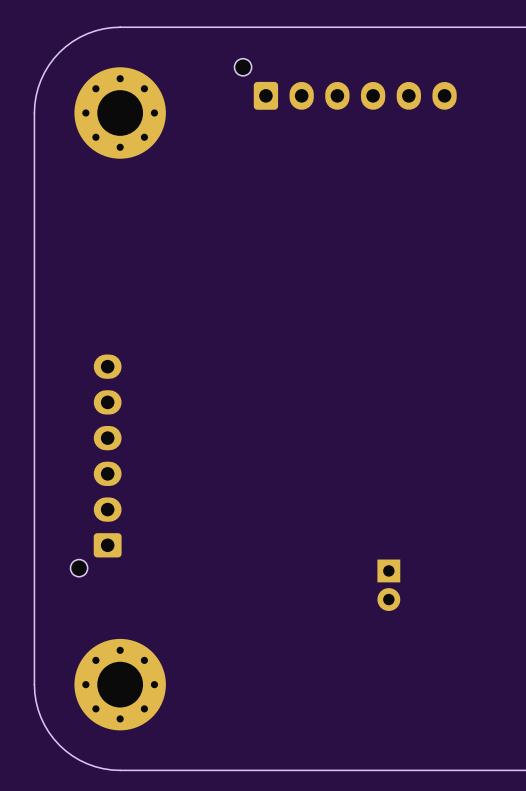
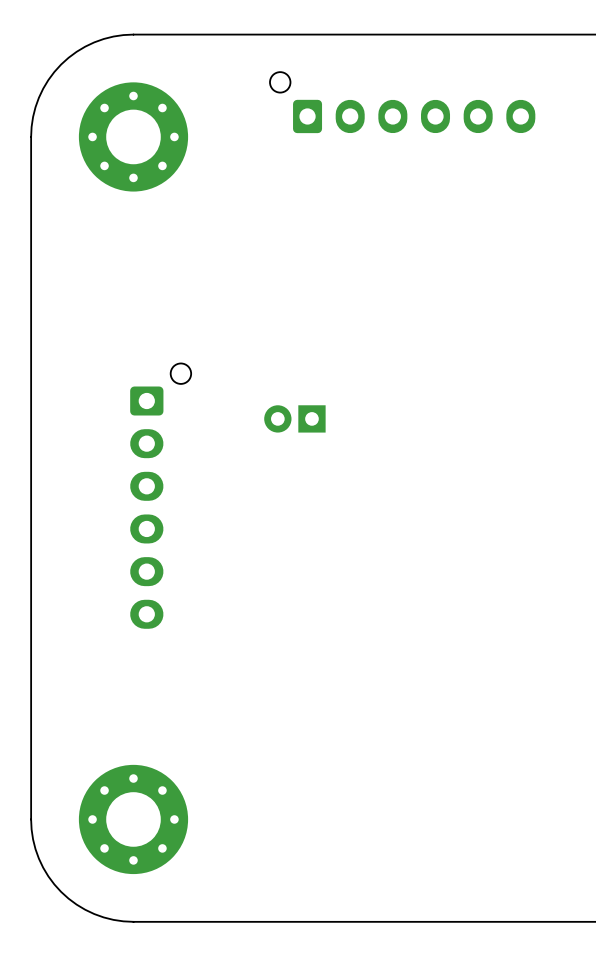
part rotation: 0° (96, 465) -> 180° (160, 496)
part rotation: 0° (388, 585) -> 90° clockwise (294, 418)
part position: (388, 585) -> (294, 418)

